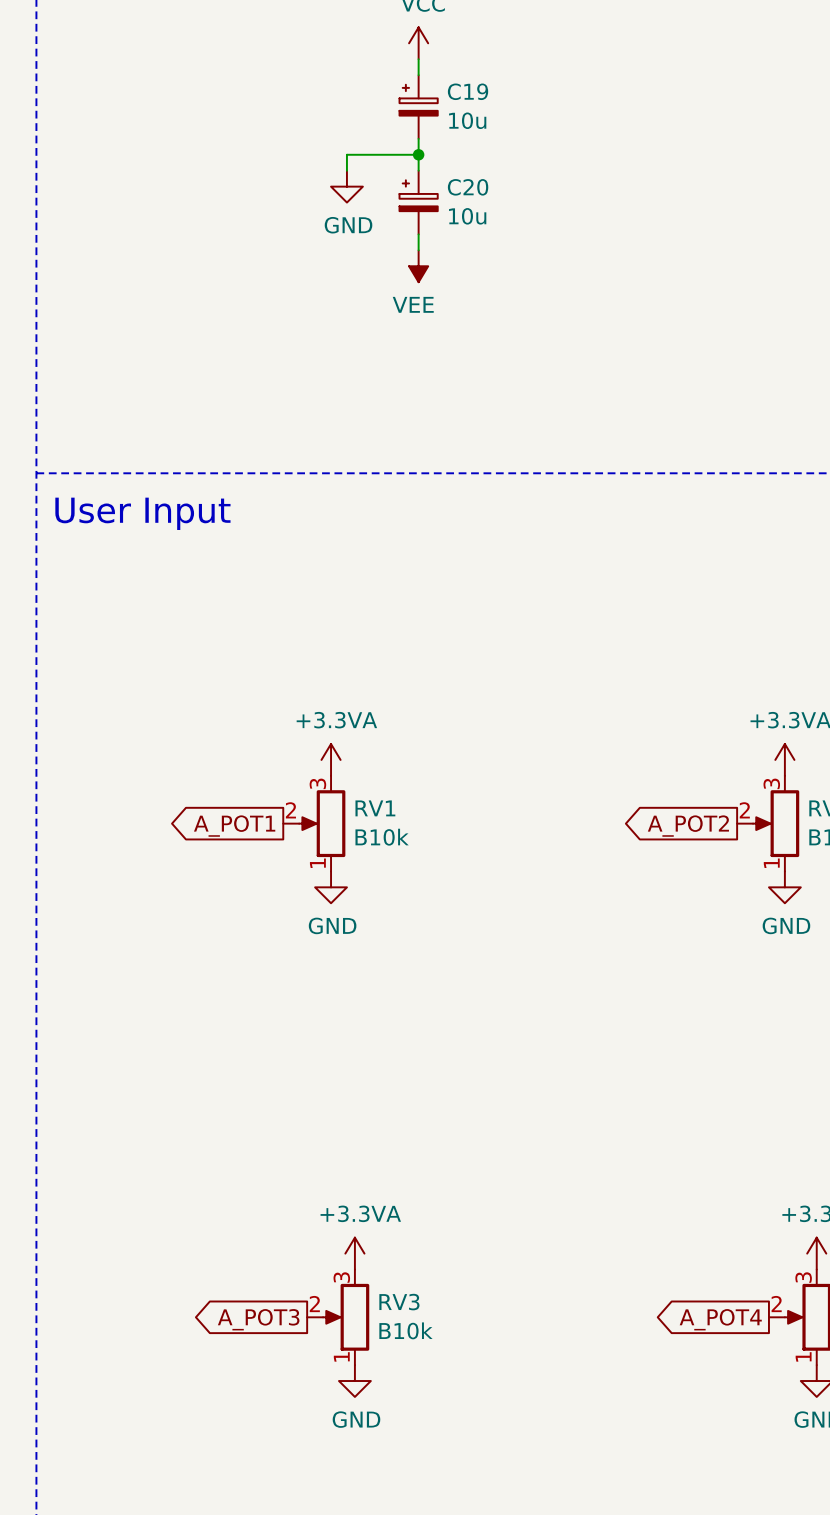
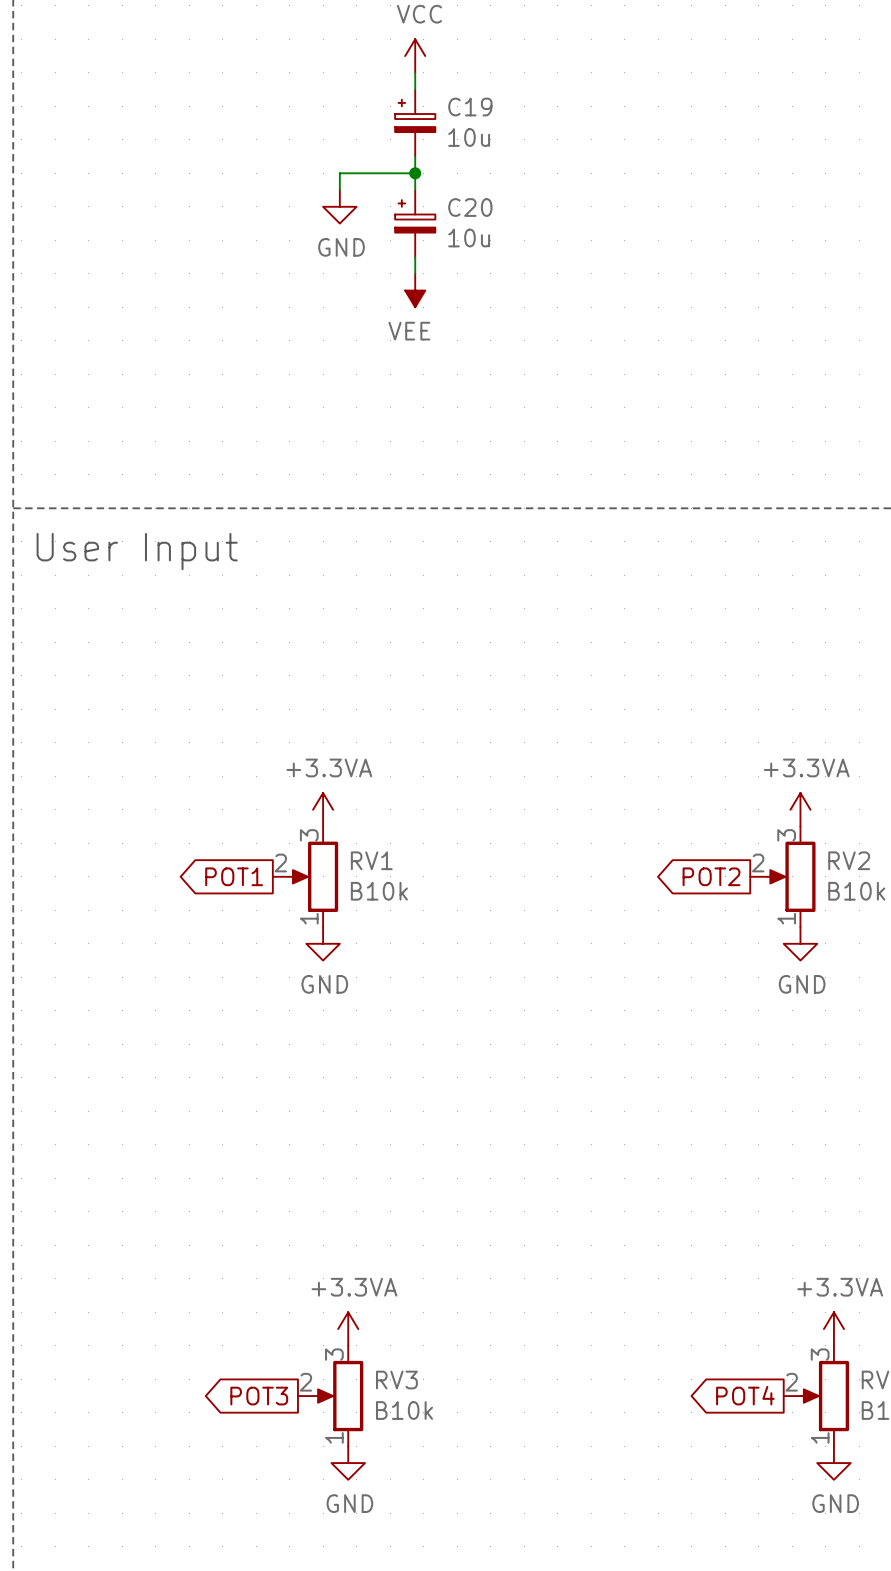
global label: A_POT1 (234, 826) -> POT1 (234, 876)
global label: A_POT2 (688, 826) -> POT2 (711, 876)
global label: A_POT3 (258, 1319) -> POT3 (259, 1396)
global label: A_POT4 (720, 1319) -> POT4 (745, 1395)

